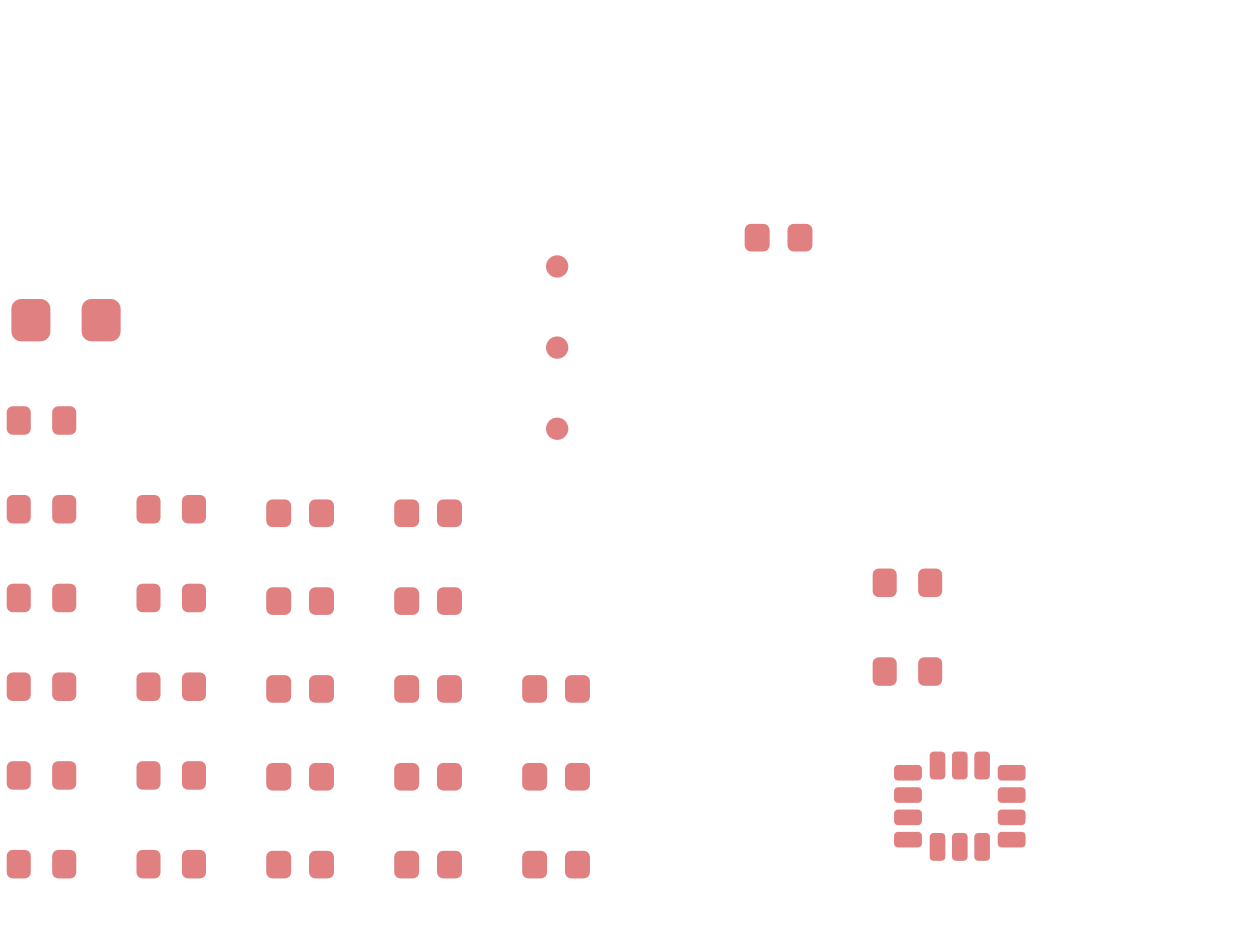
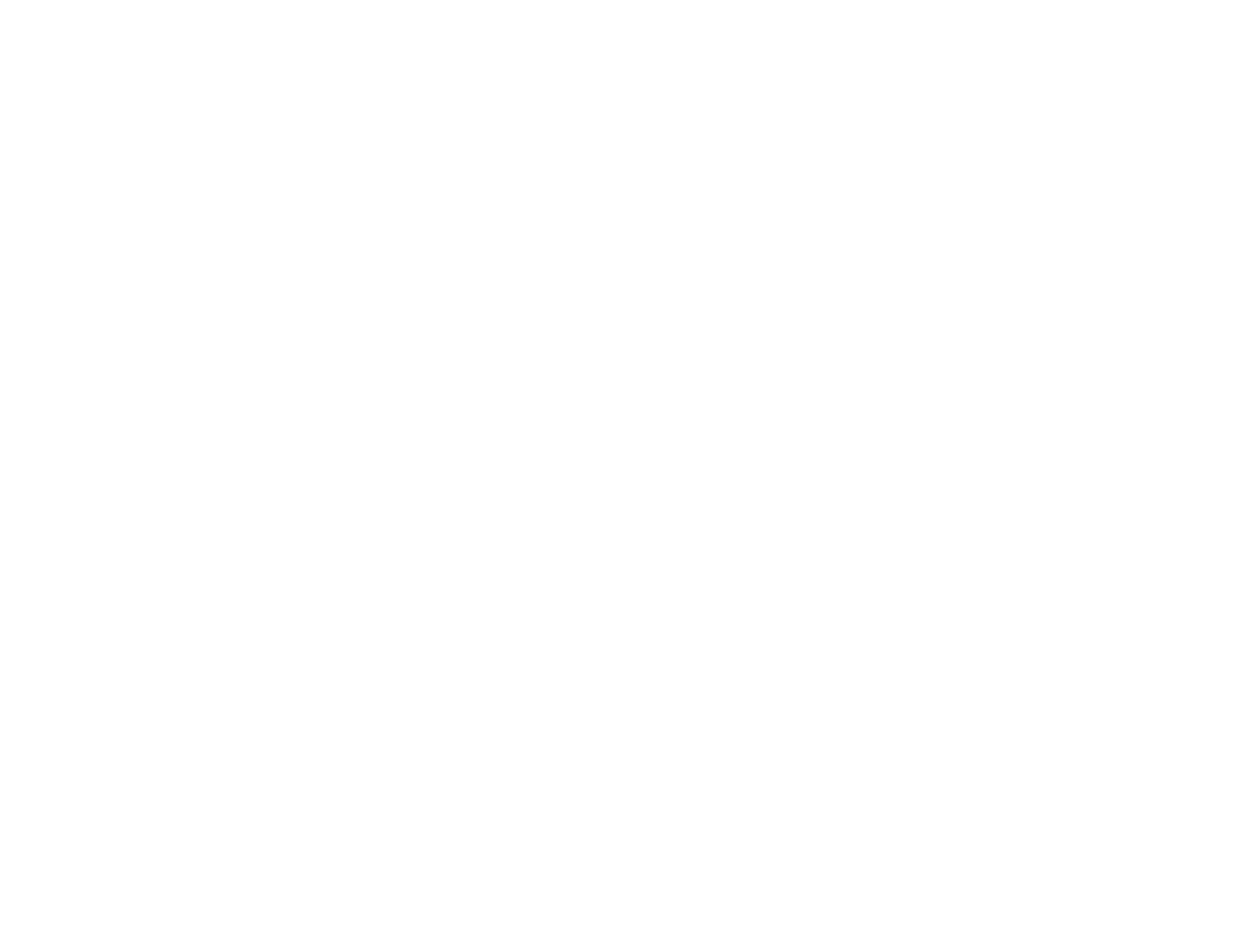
part: (778, 237) -> none
part: (557, 266) -> none
part: (66, 320) -> none
part: (557, 347) -> none
part: (41, 420) -> none
part: (557, 428) -> none
part: (41, 509) -> none
part: (171, 509) -> none
part: (300, 513) -> none
part: (428, 513) -> none
part: (907, 582) -> none
part: (41, 597) -> none
part: (171, 597) -> none
part: (300, 601) -> none
part: (428, 601) -> none
part: (907, 671) -> none
part: (41, 686) -> none
part: (171, 686) -> none
part: (300, 688) -> none
part: (428, 688) -> none
part: (556, 688) -> none
part: (41, 775) -> none
part: (171, 775) -> none
part: (300, 776) -> none
part: (428, 776) -> none
part: (556, 776) -> none
part: (959, 806) -> none
part: (41, 864) -> none
part: (171, 864) -> none
part: (300, 864) -> none
part: (428, 864) -> none
part: (556, 864) -> none

